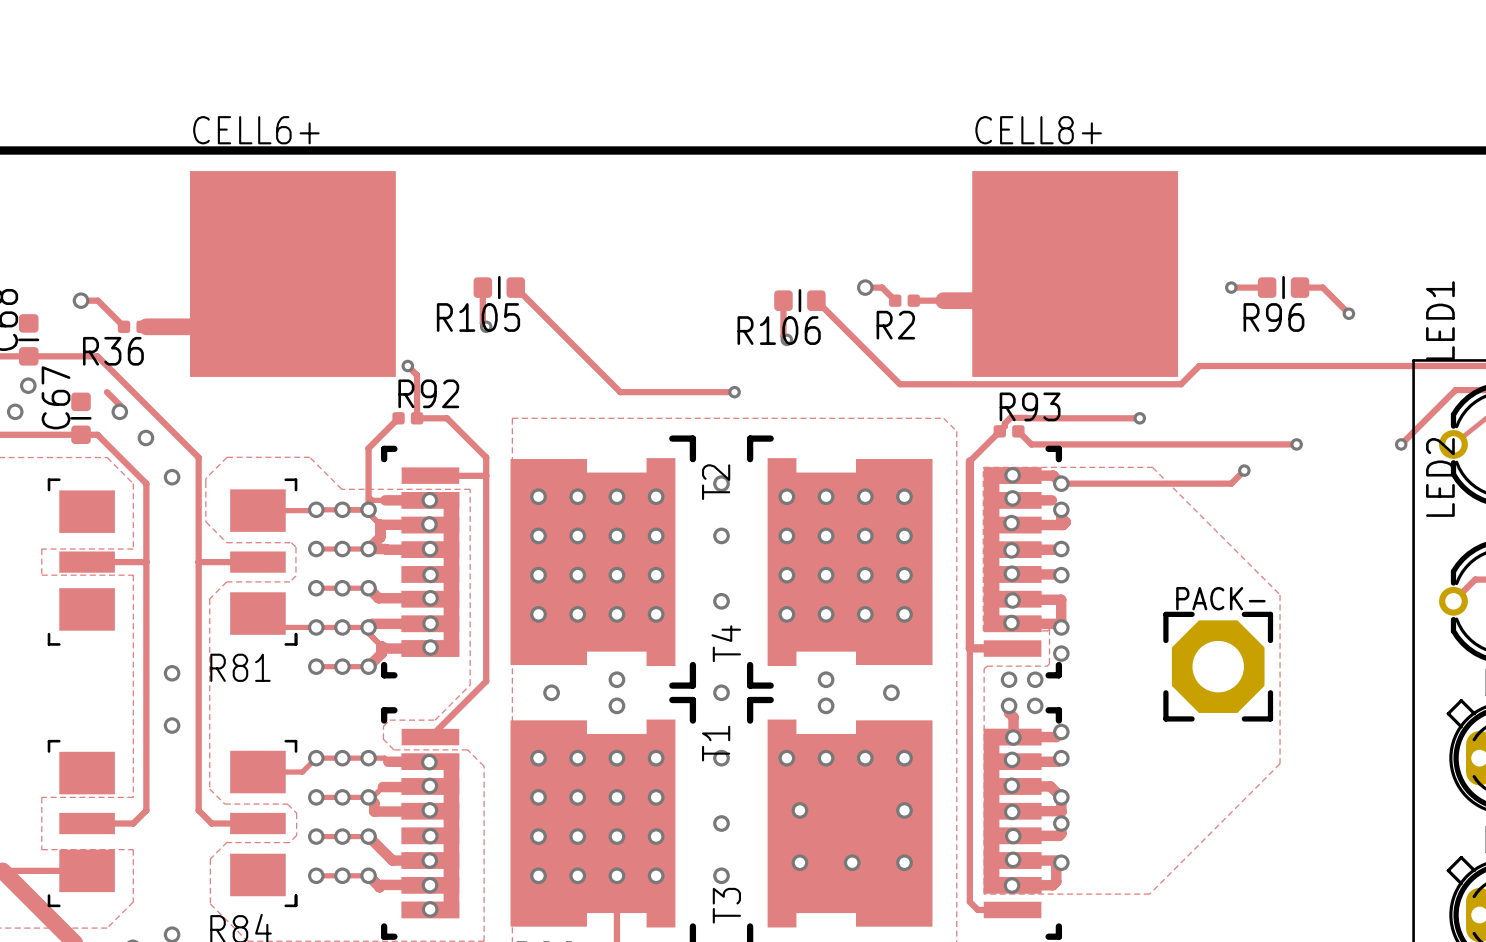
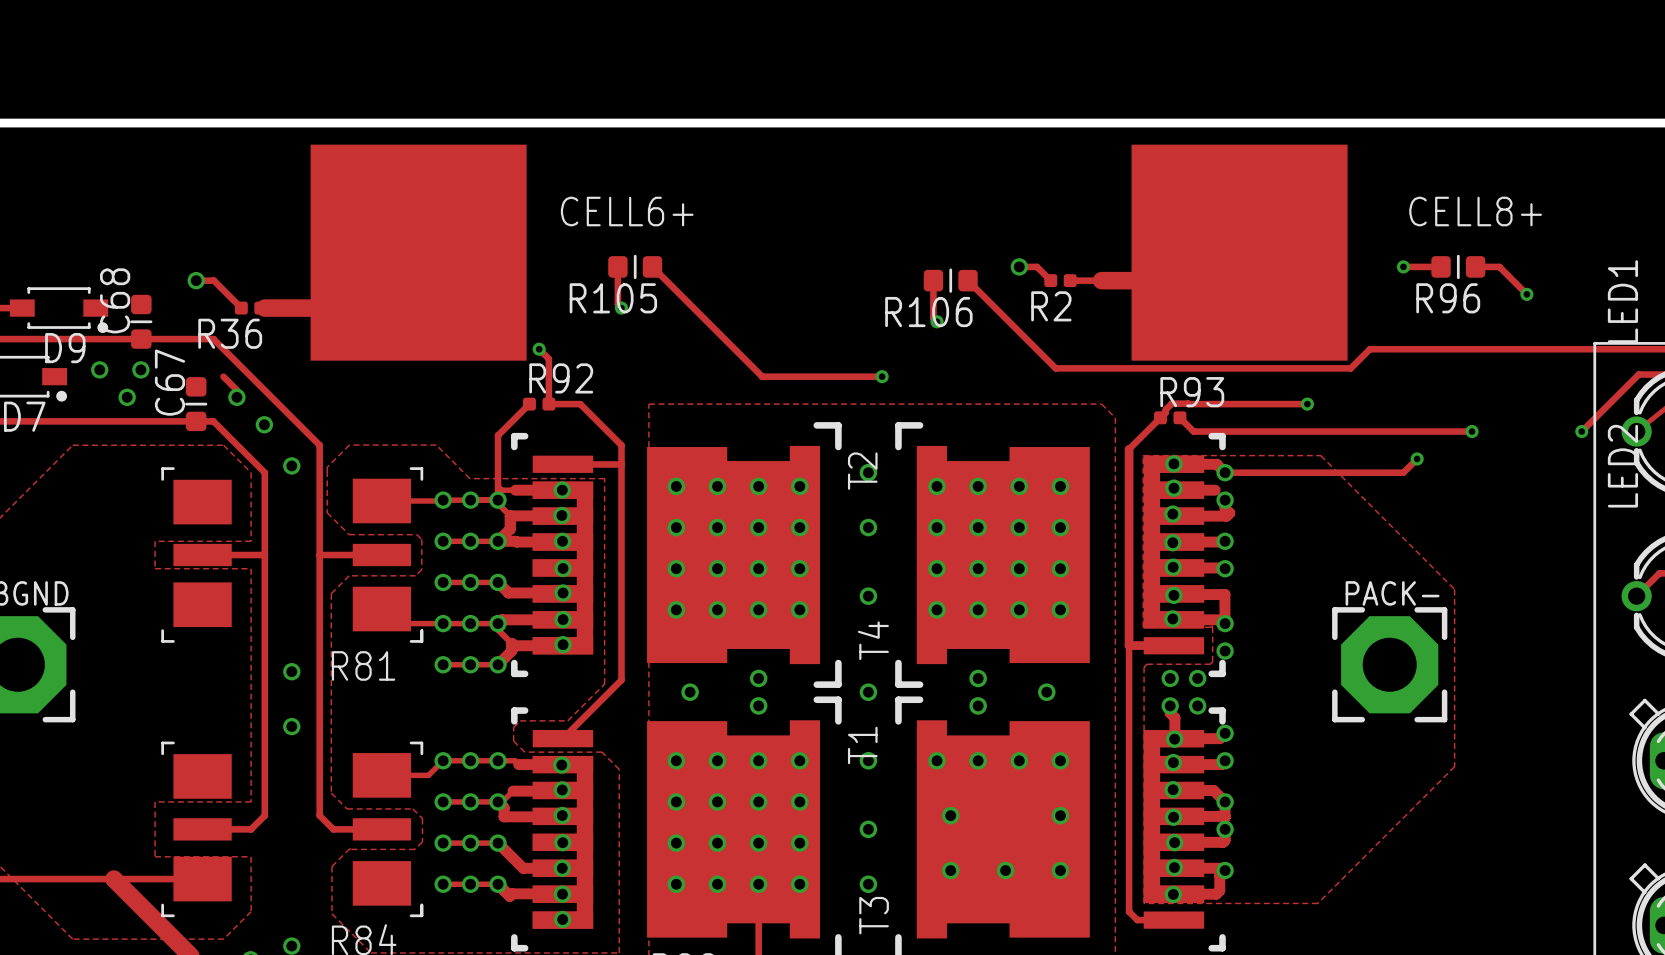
CELL6+ name position: CELL6+ (256, 130) -> CELL6+ (627, 211)
CELL8+ name position: CELL8+ (1038, 130) -> CELL8+ (1475, 211)

